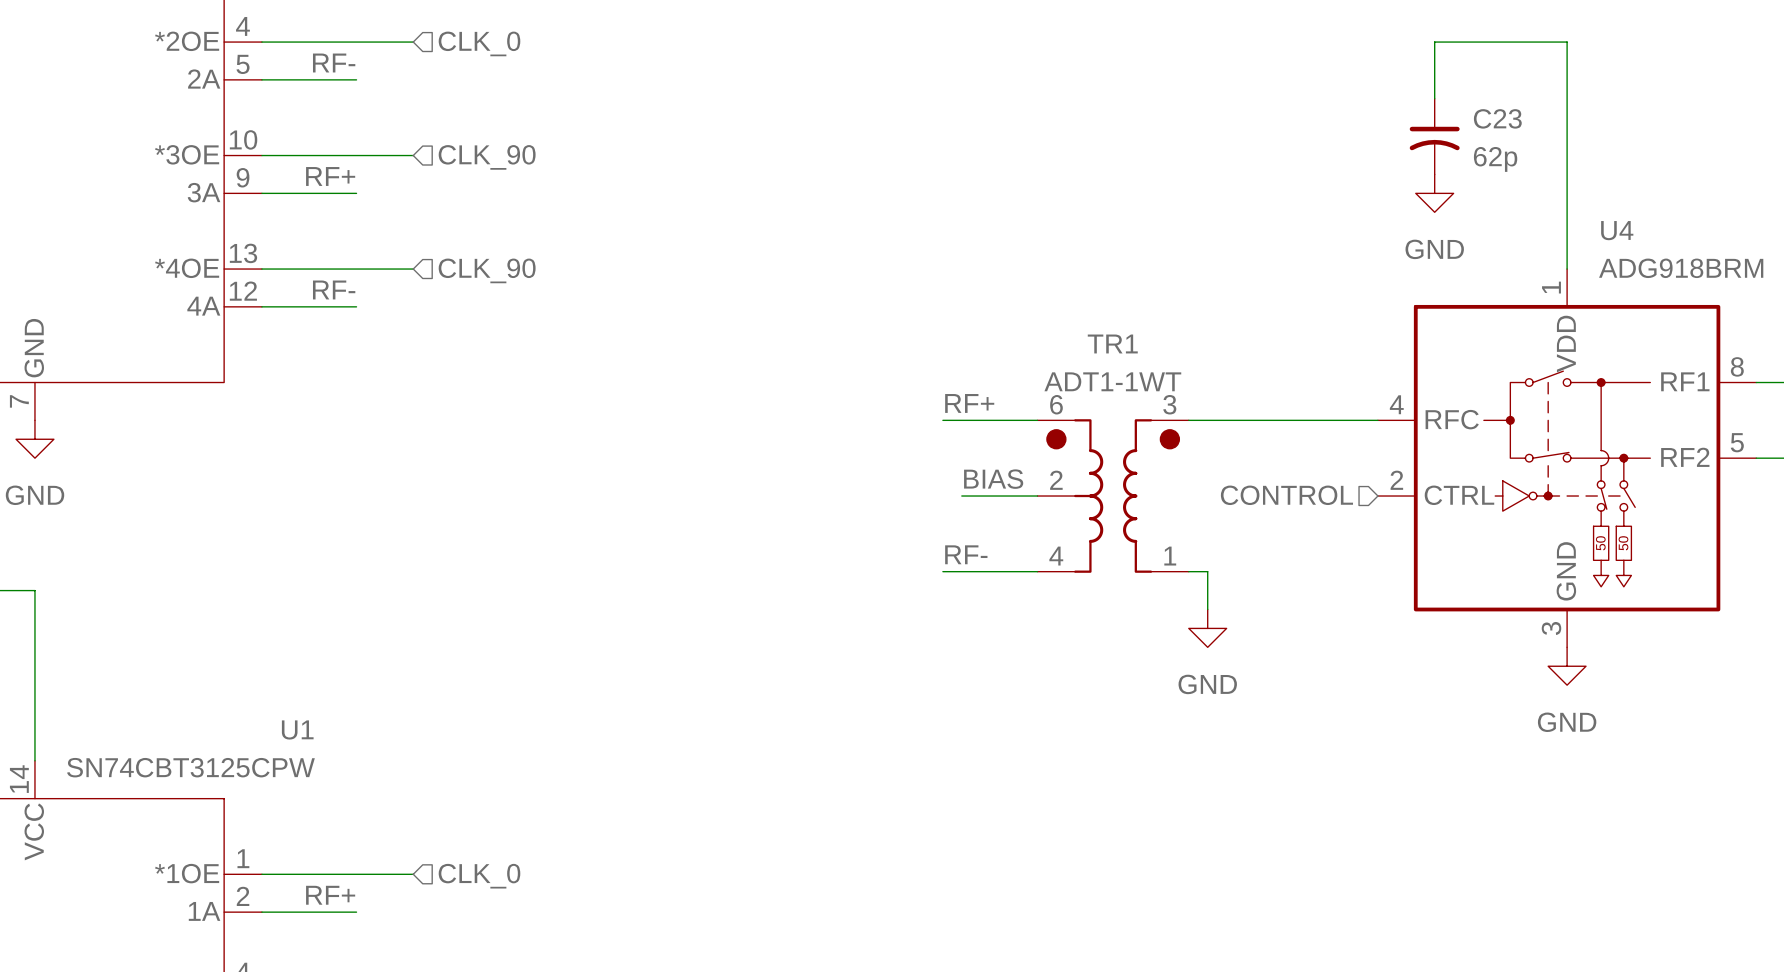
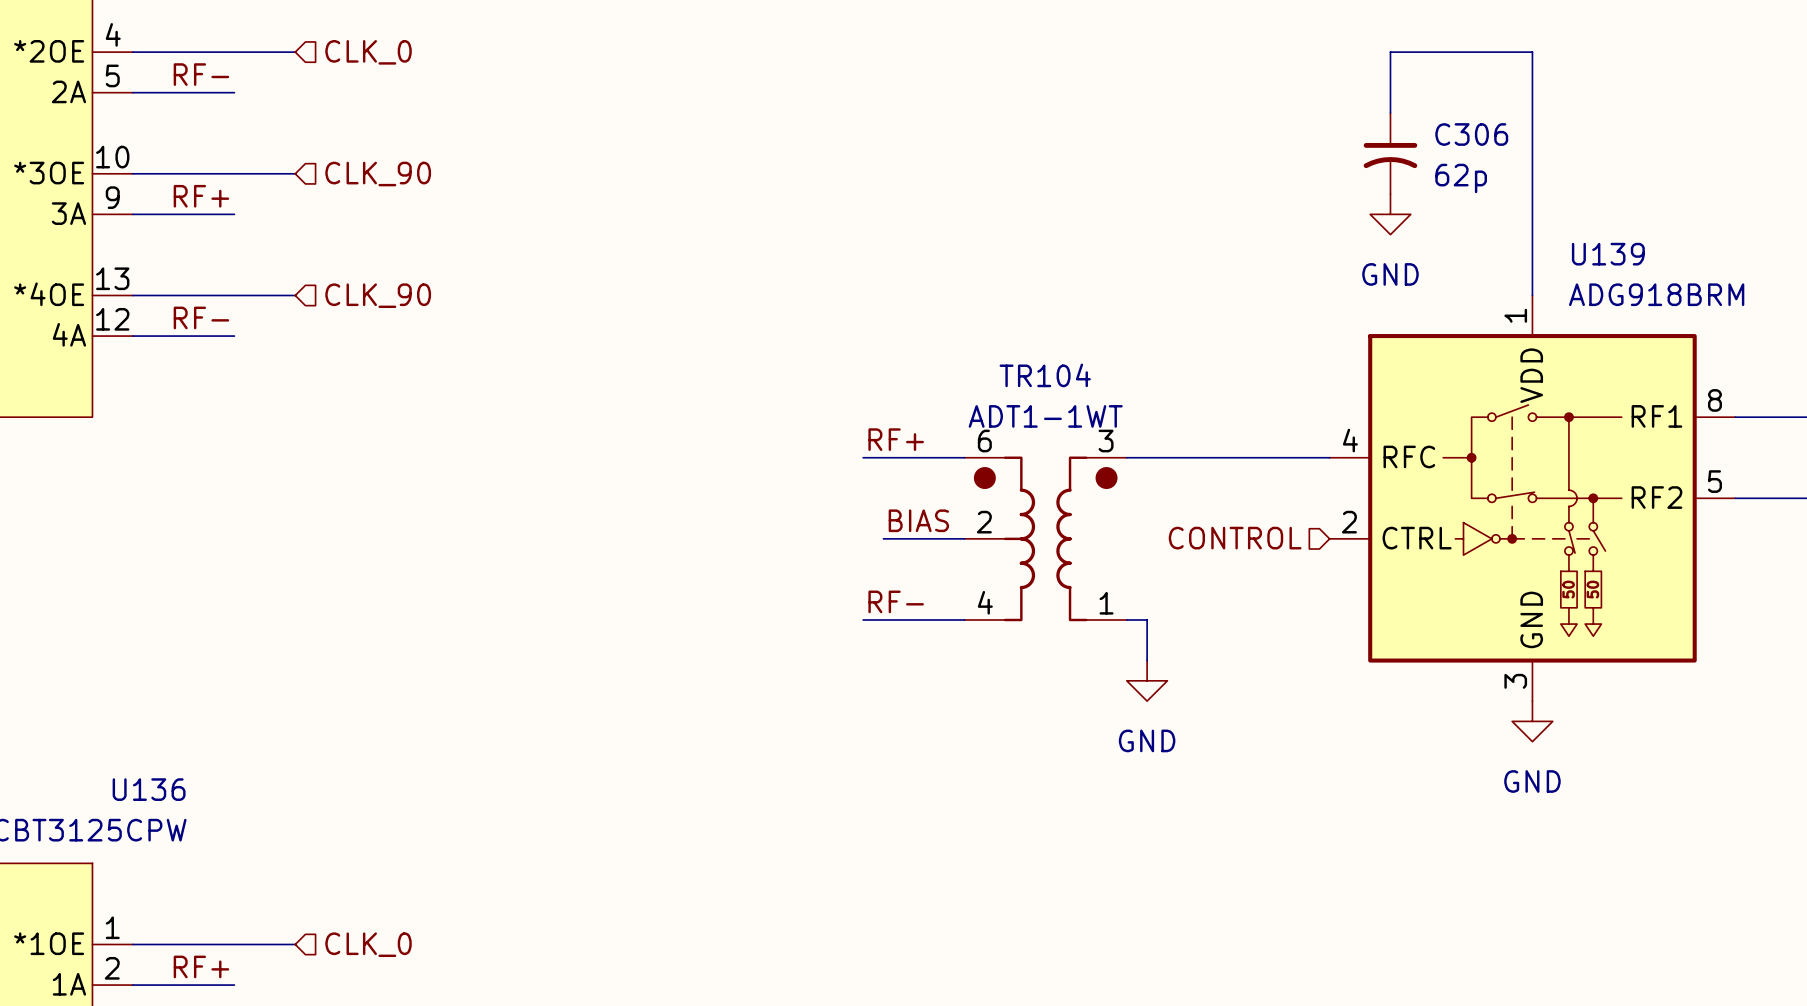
C23 name: C23 (1497, 118) -> C306 (1471, 134)
U4 name: U4 (1617, 230) -> U139 (1608, 254)
TR1 name: TR1 (1112, 343) -> TR104 (1045, 375)
U1 name: U1 (297, 729) -> U136 (149, 789)

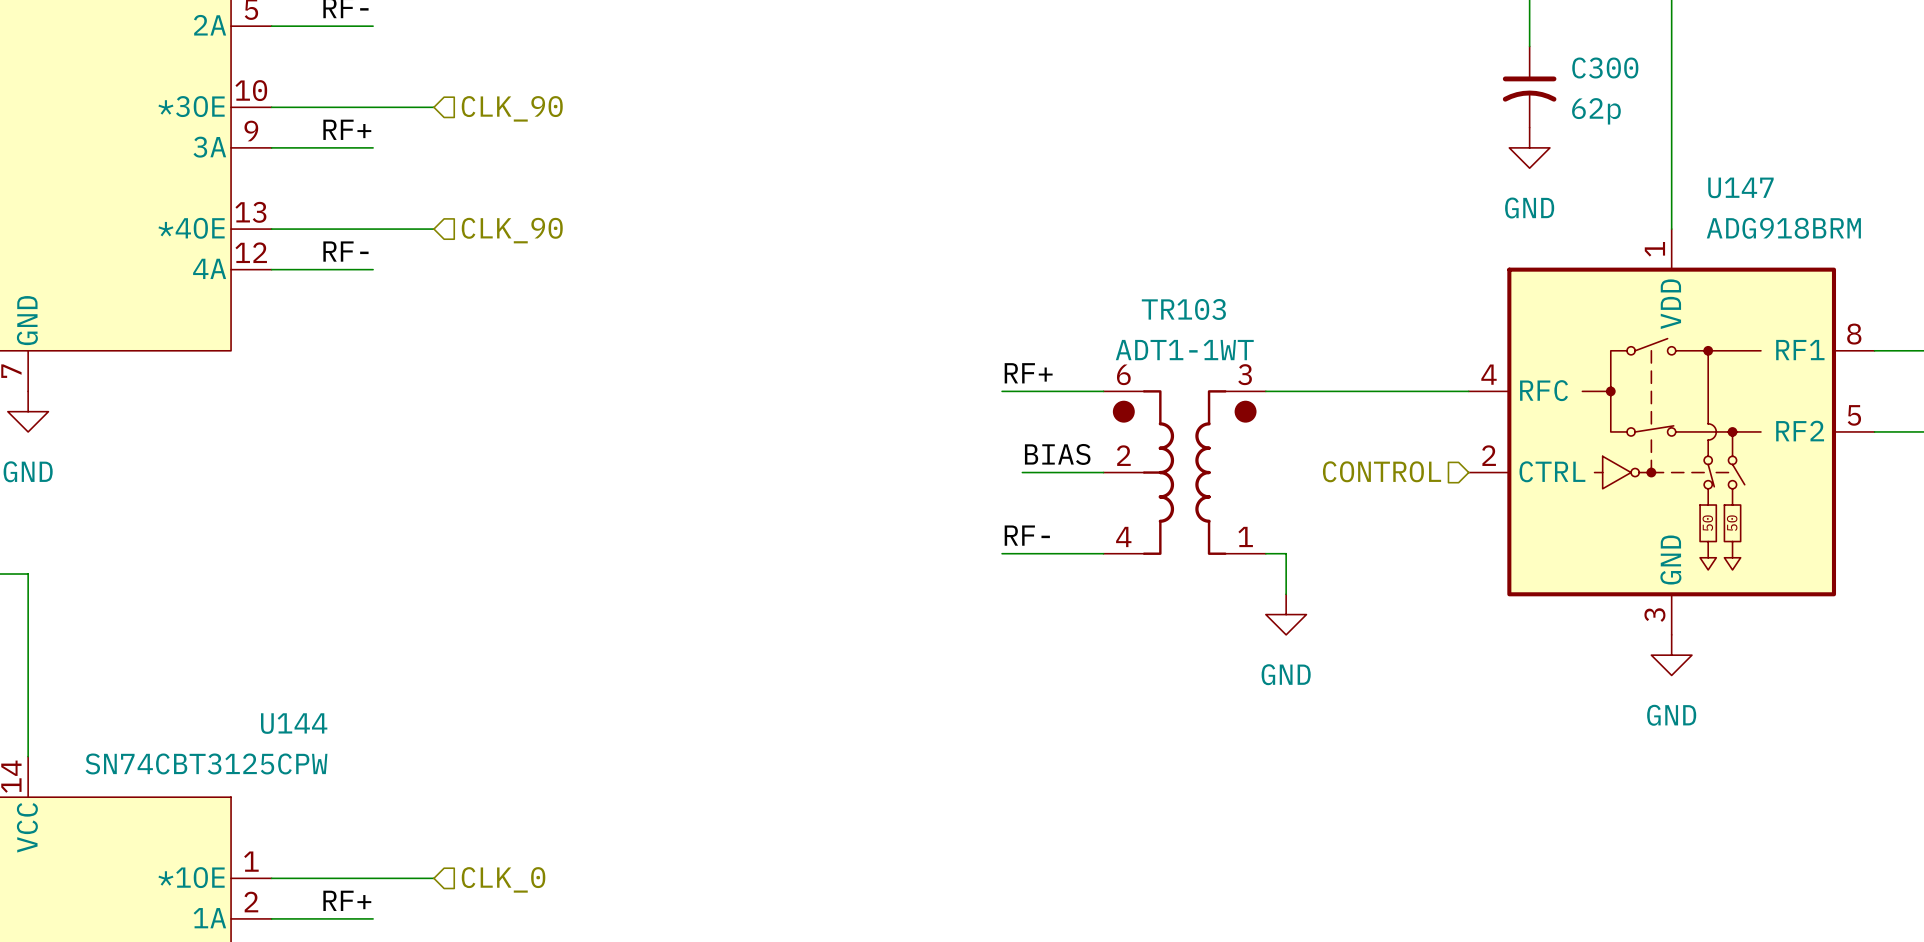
C306 name: C306 (1471, 134) -> C300 (1605, 68)
U139 name: U139 (1608, 254) -> U147 (1740, 187)
TR104 name: TR104 (1045, 375) -> TR103 (1183, 309)
U136 name: U136 (149, 789) -> U144 (294, 723)

